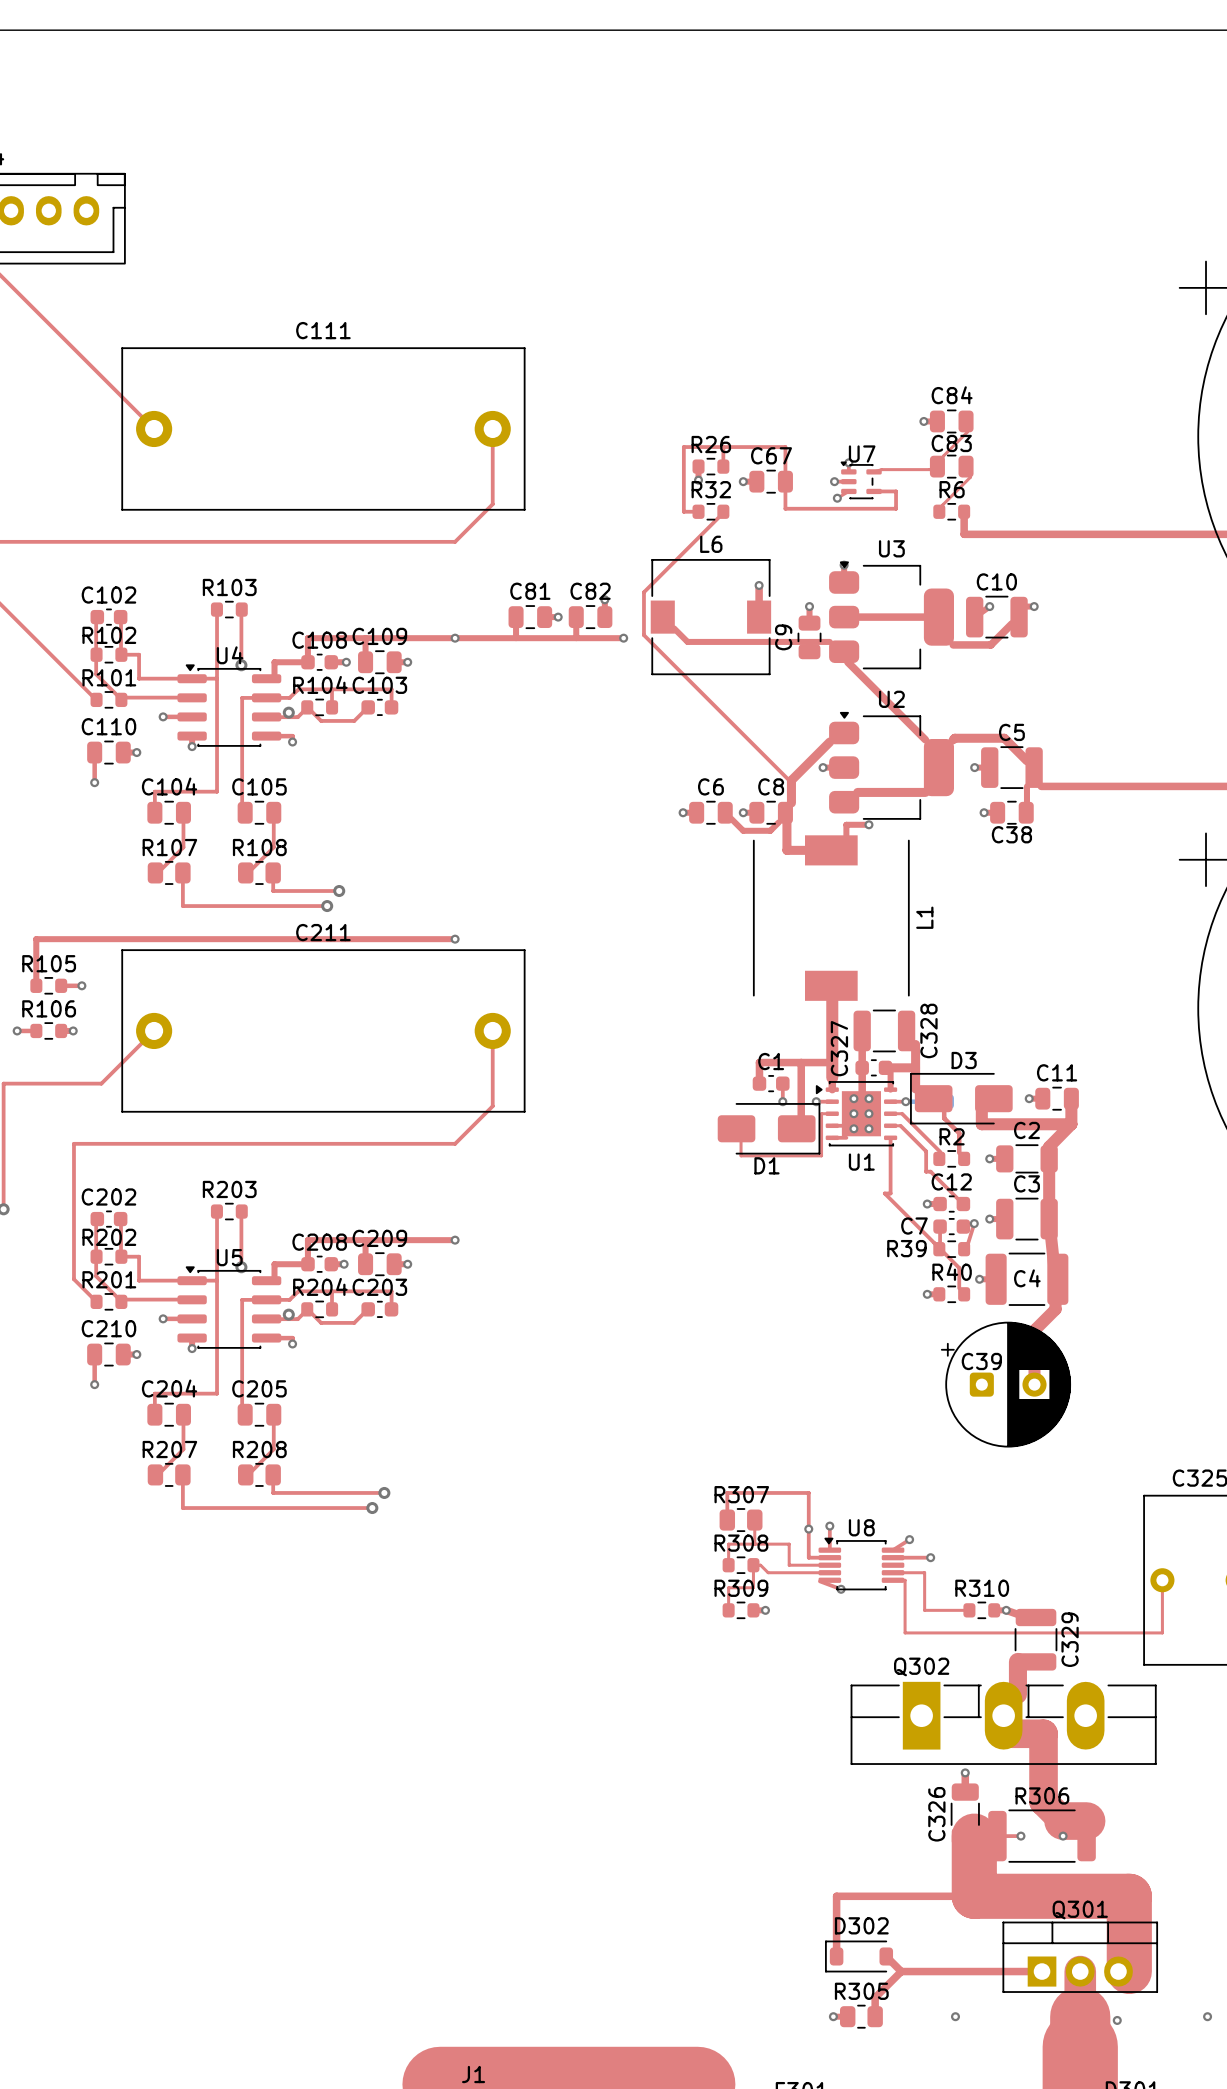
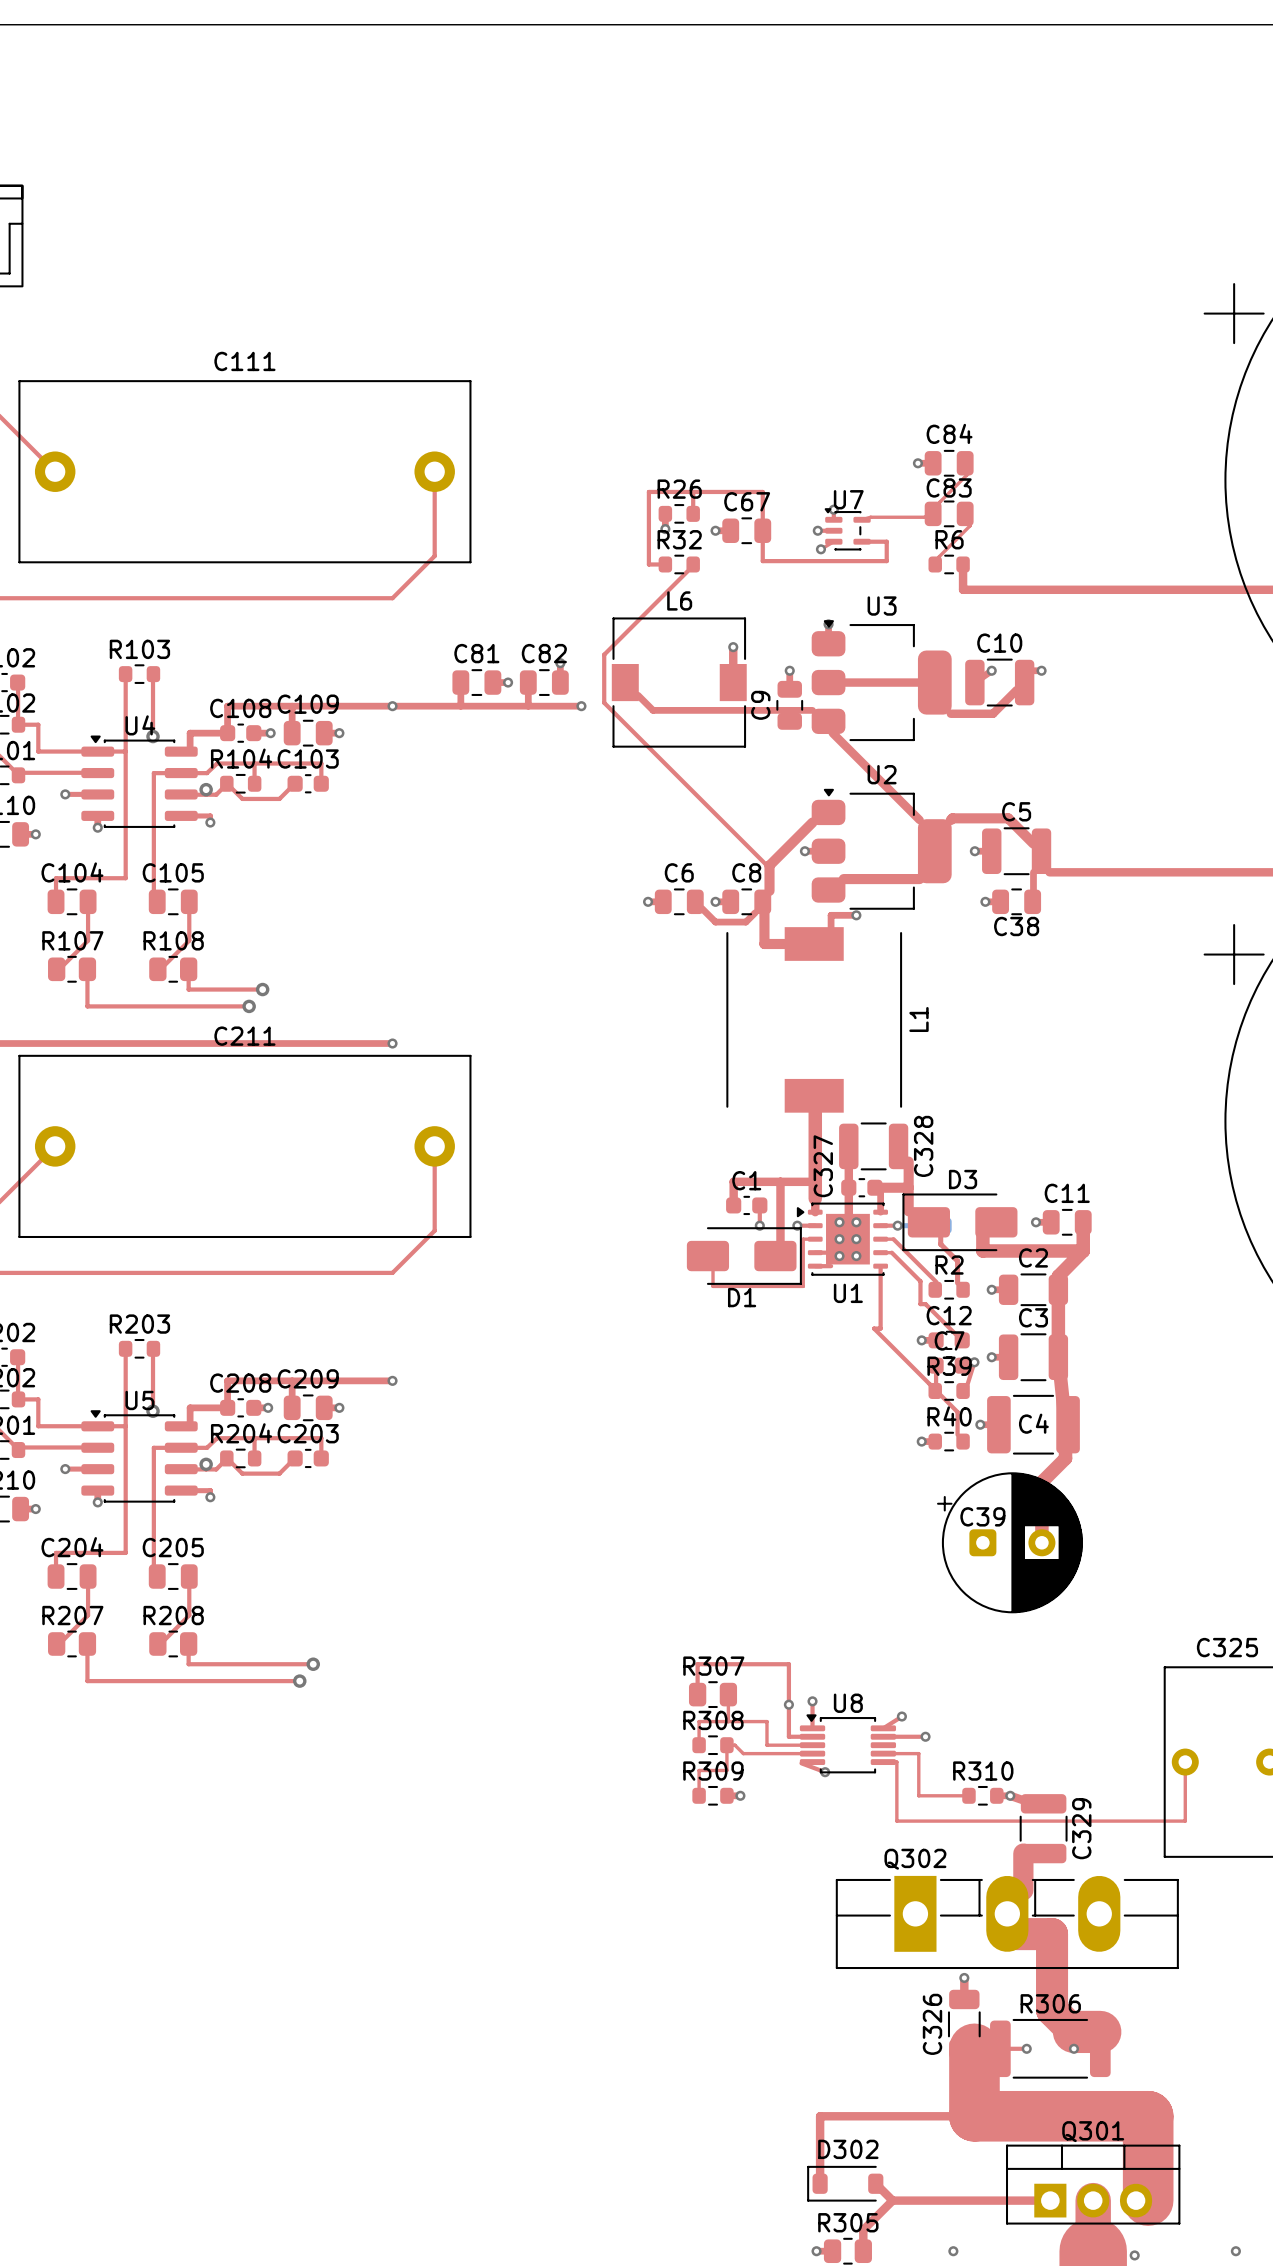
C7 name position: C7 (914, 1226) -> C7 (949, 1340)
R39 name position: R39 (906, 1248) -> R39 (949, 1366)

